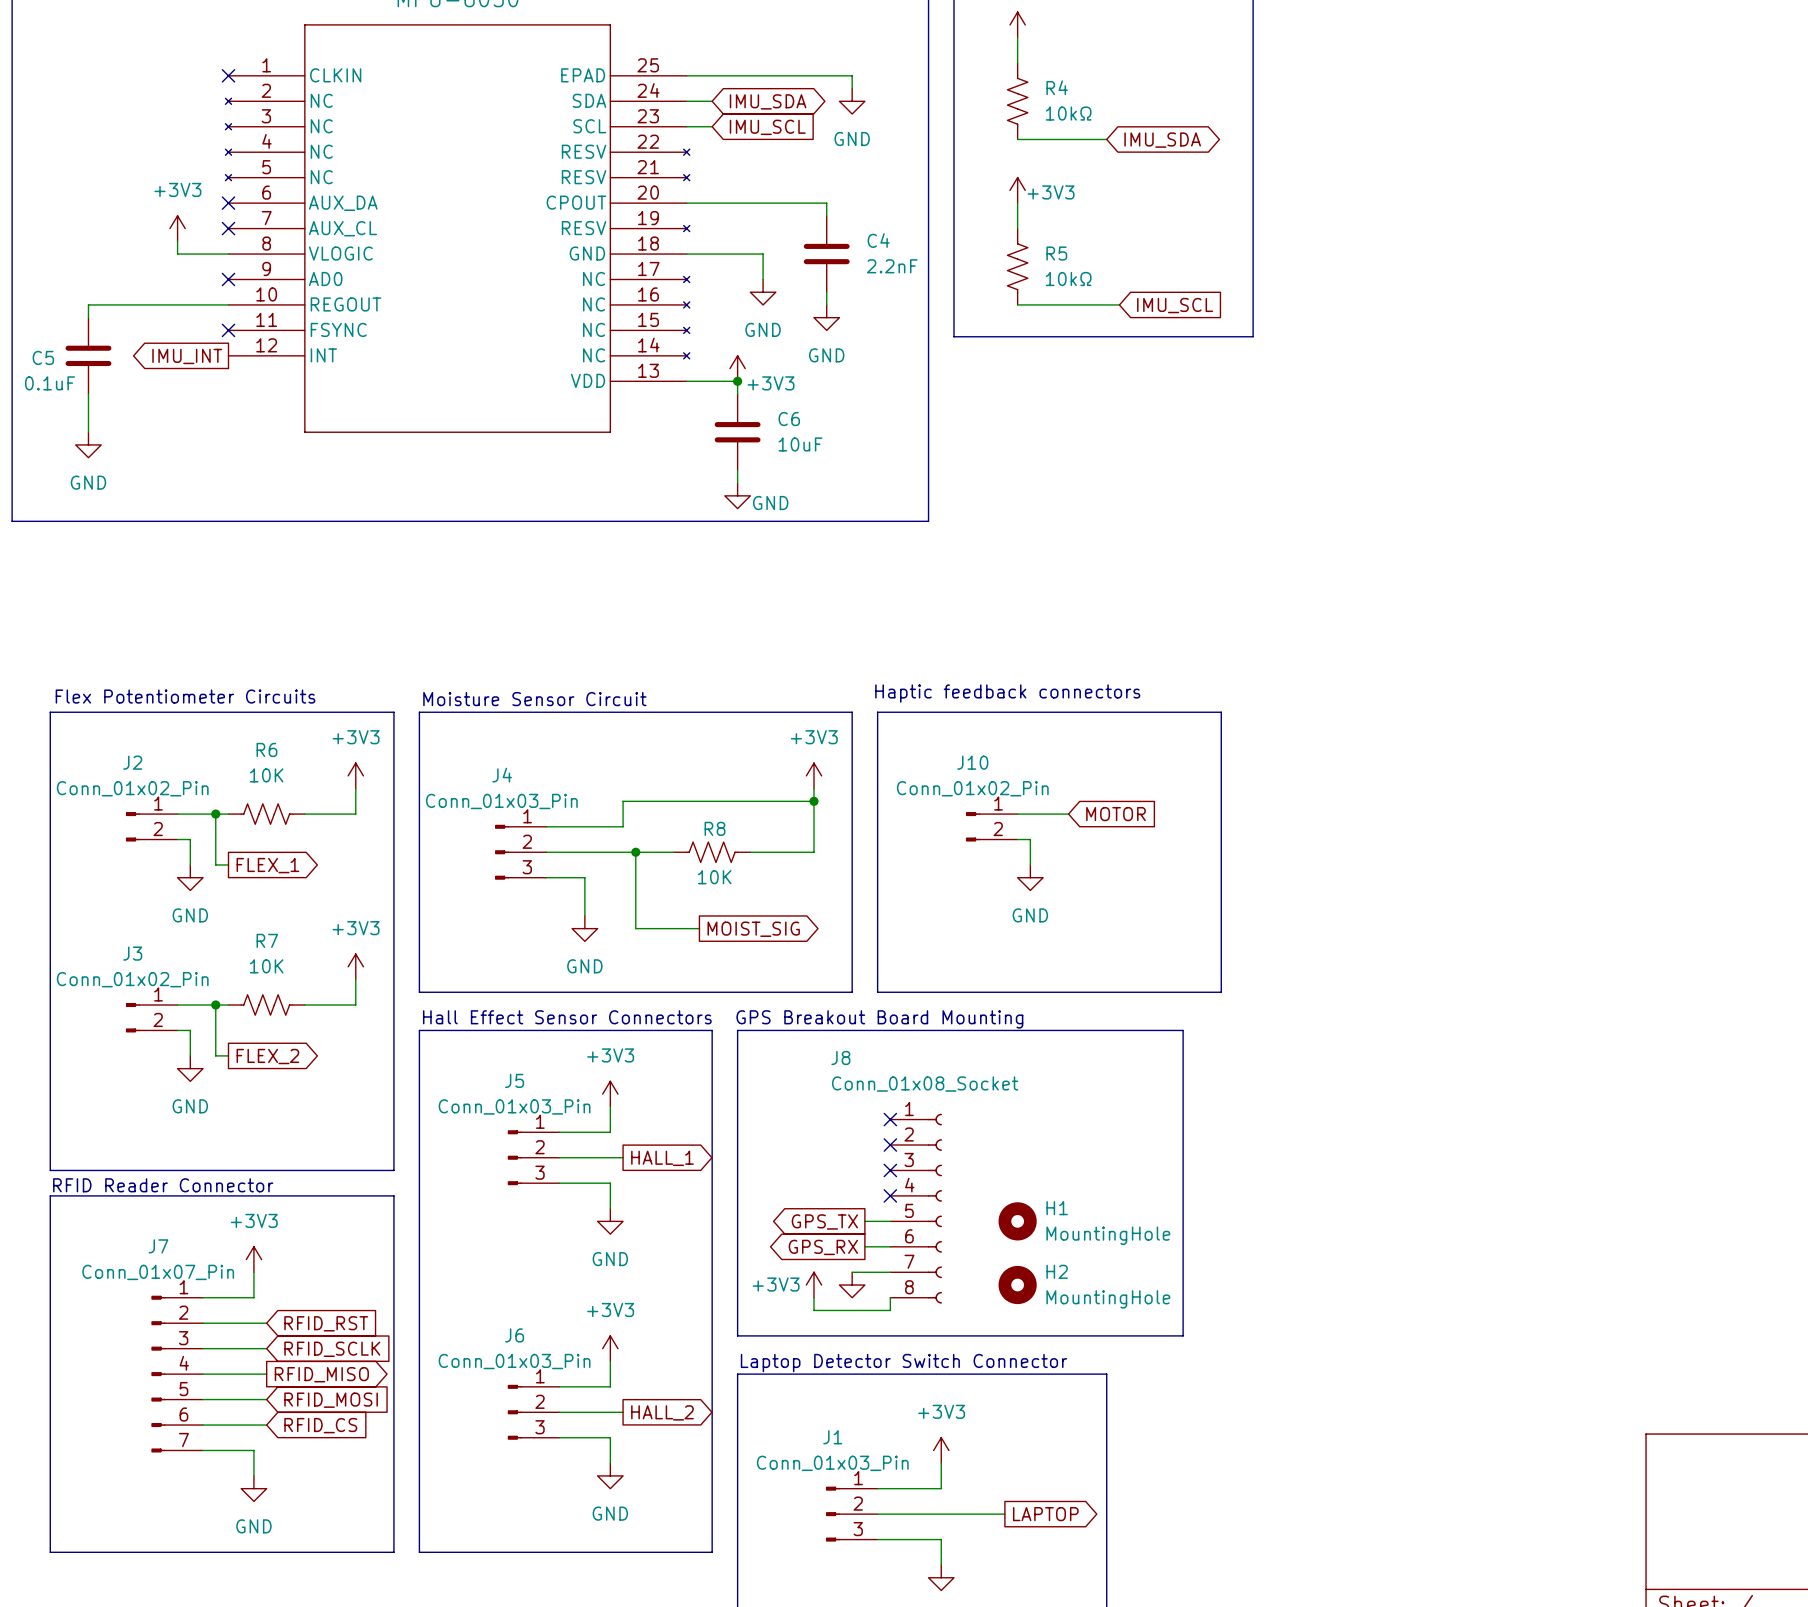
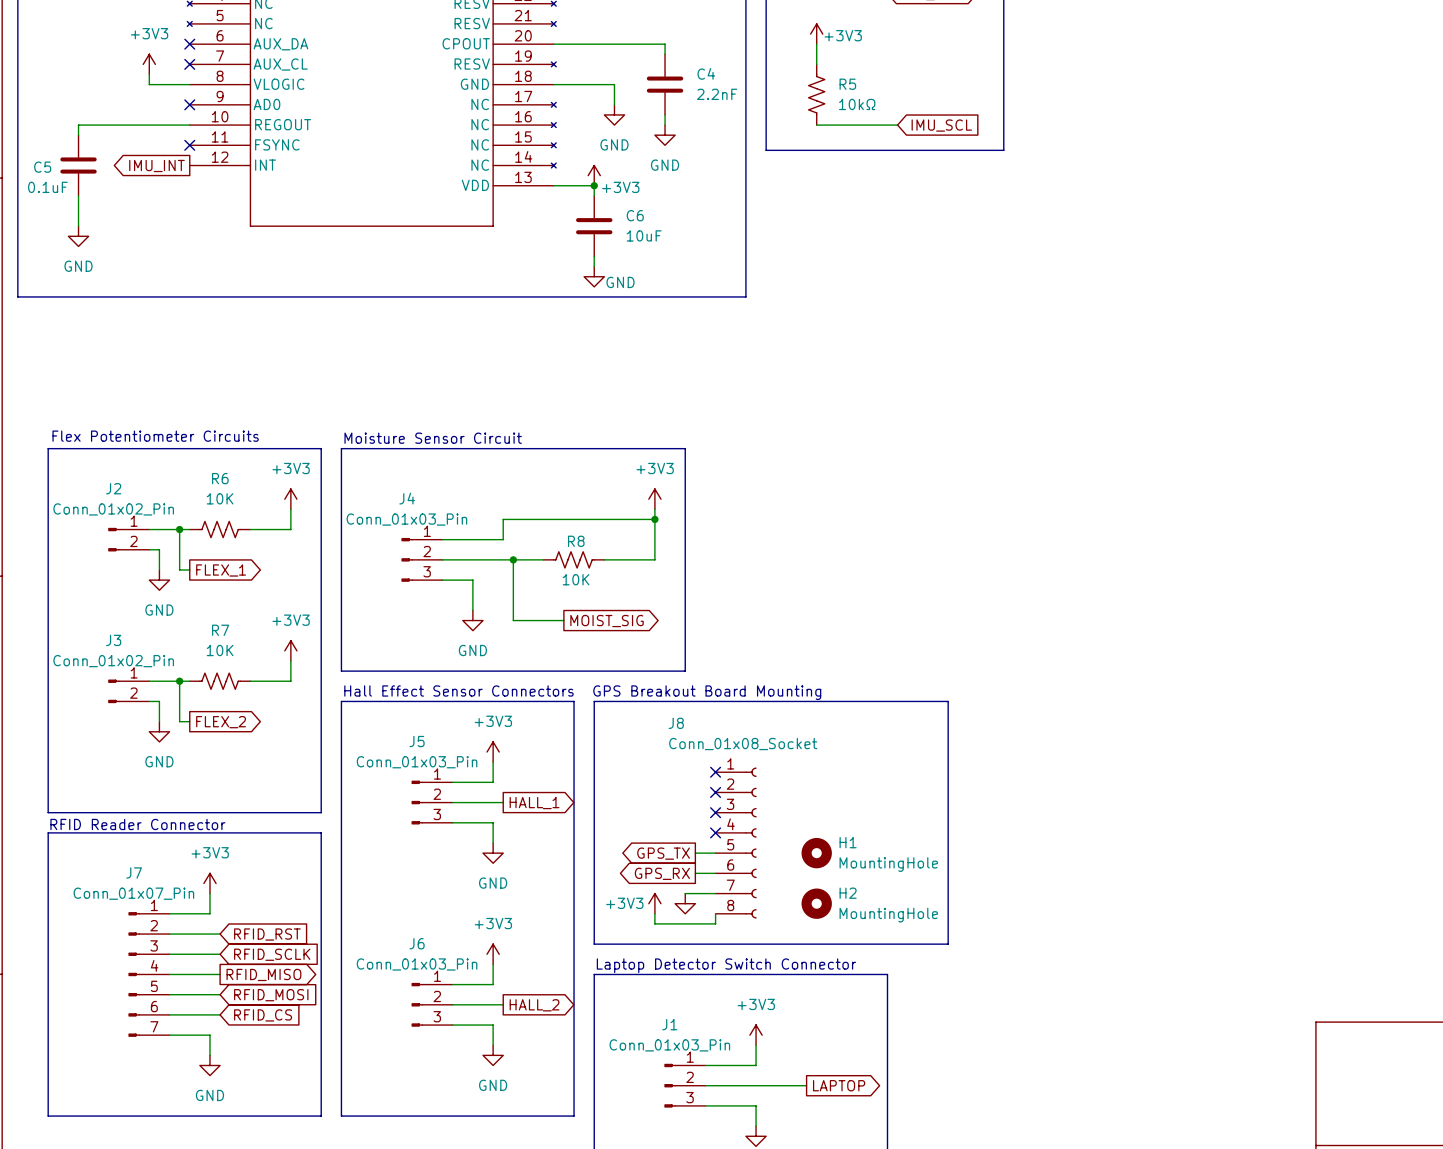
text: Haptic feedback connectors (1007, 693) -> none
line: (877, 712) (1221, 712) (1221, 992) (877, 992) (877, 712) -> none
wire: (1017, 814) (1068, 814) -> none
global label: MOTOR (1115, 814) -> none
J10: Conn_01x02_Pin (991, 826) -> none
wire: (1017, 839) (1030, 839) (1030, 864) -> none
power symbol: GND (1030, 877) -> none

